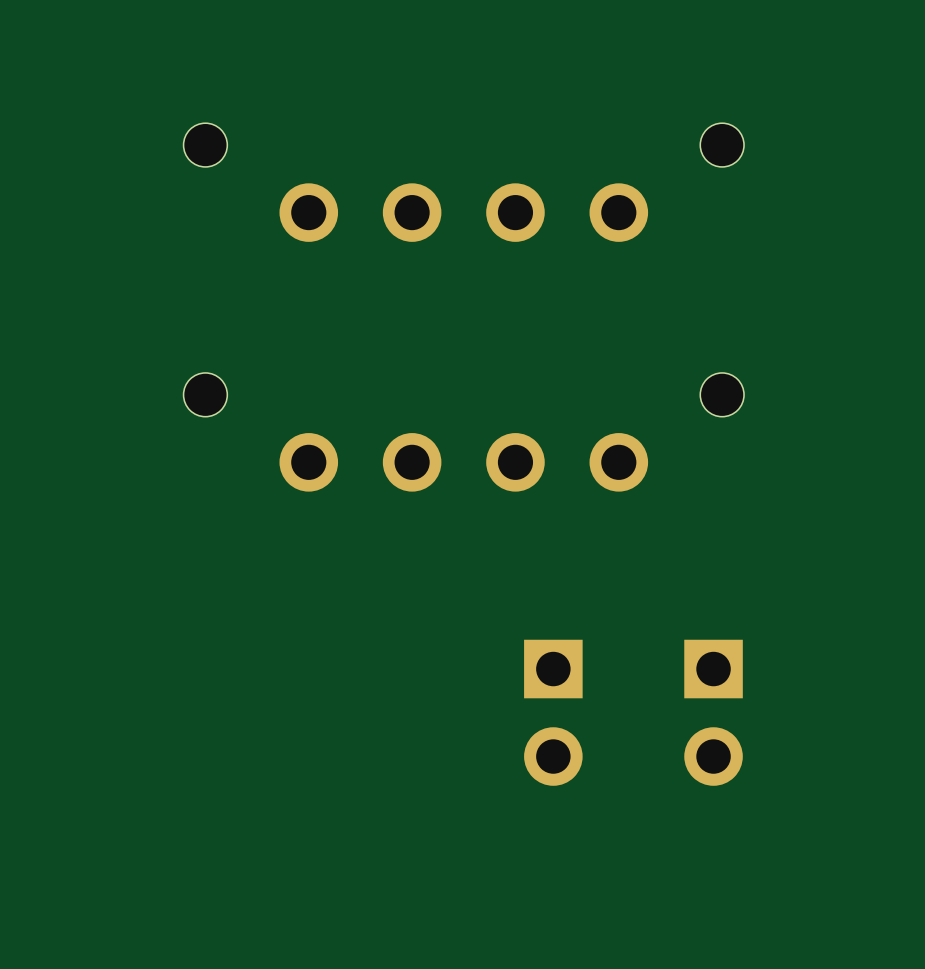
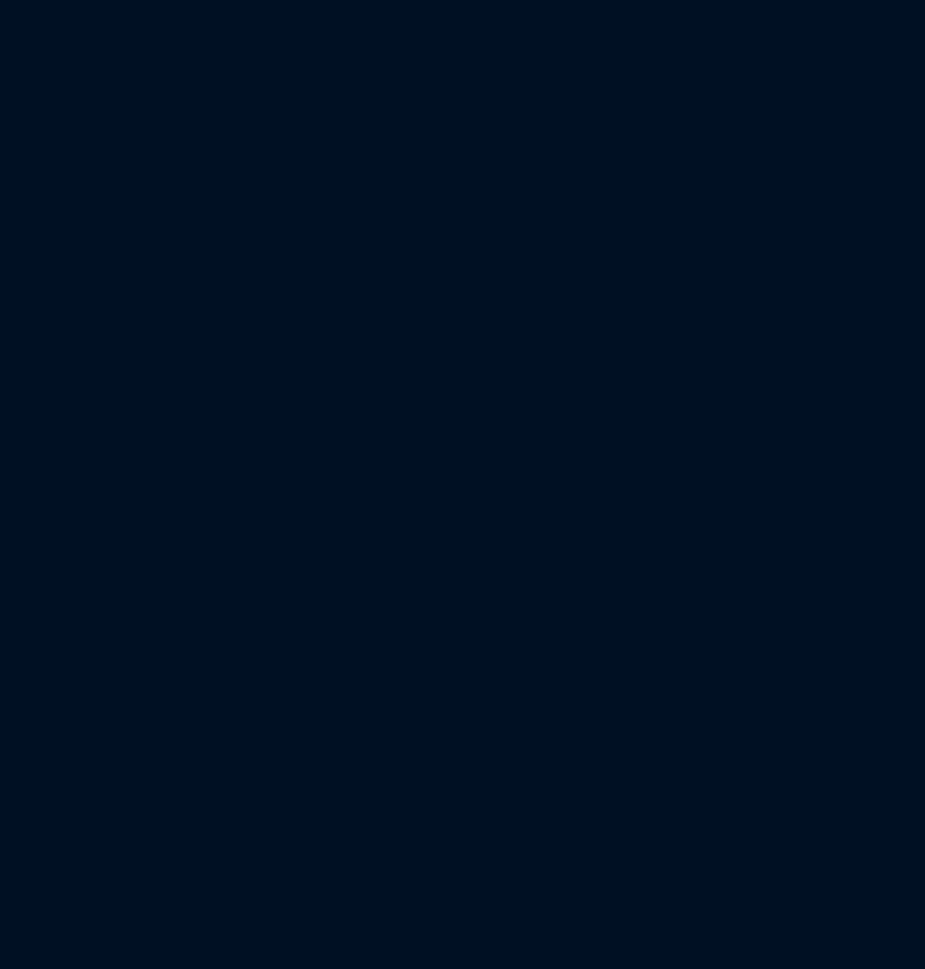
part: (463, 182) -> none
part: (463, 432) -> none
part: (553, 712) -> none
part: (713, 712) -> none

